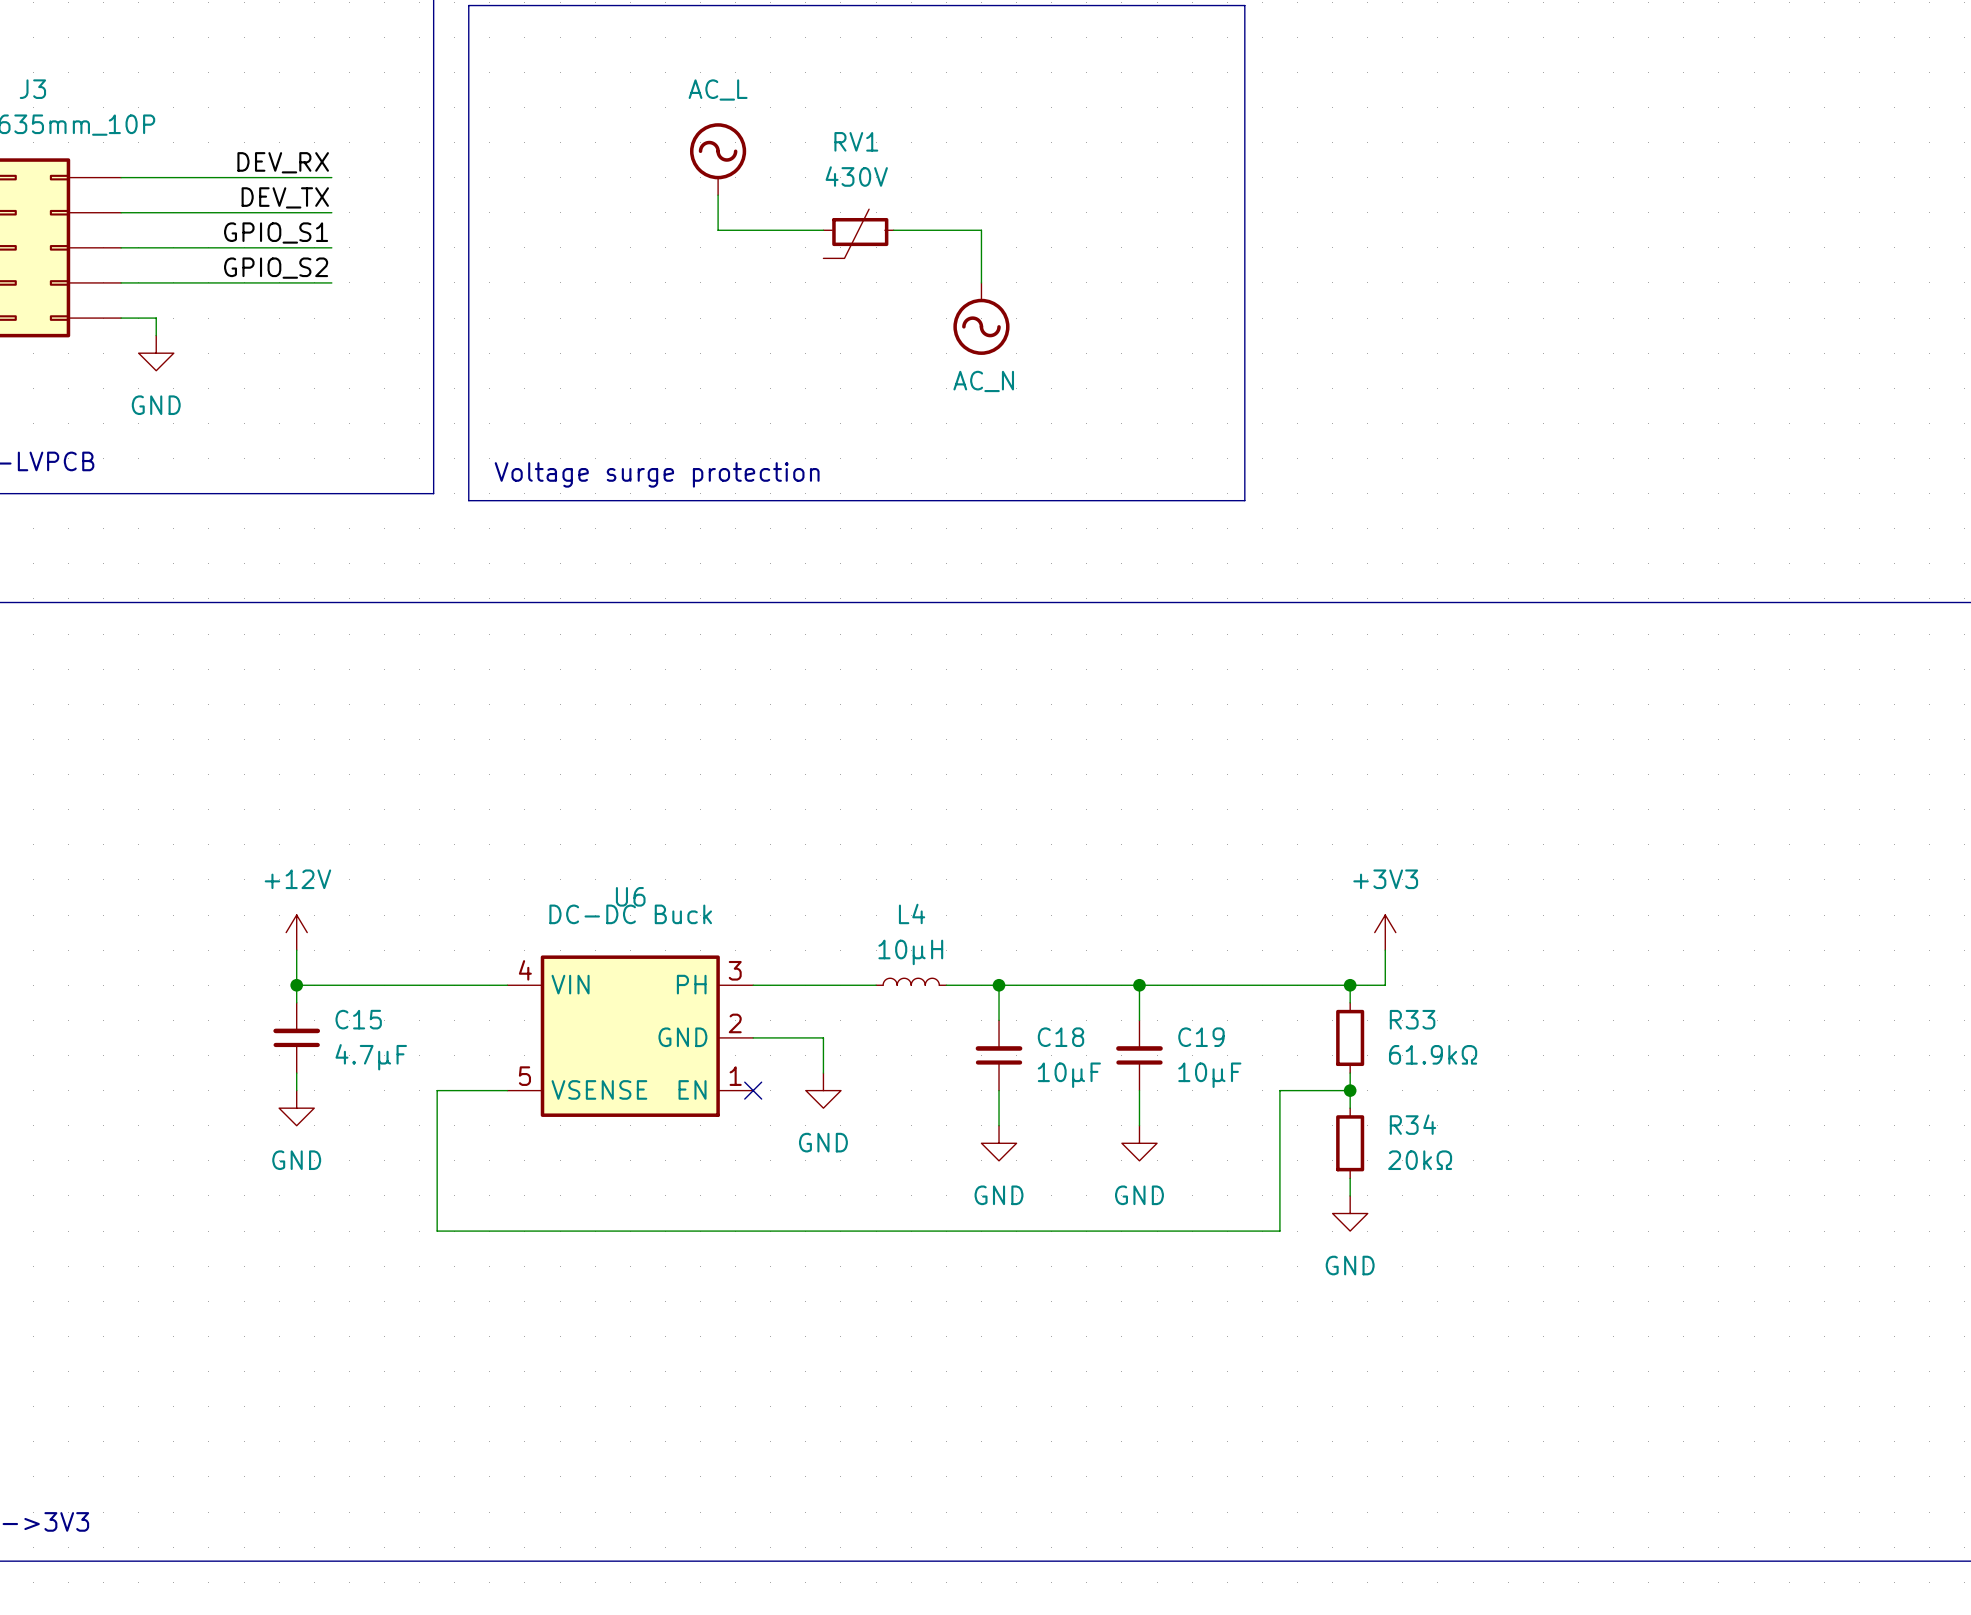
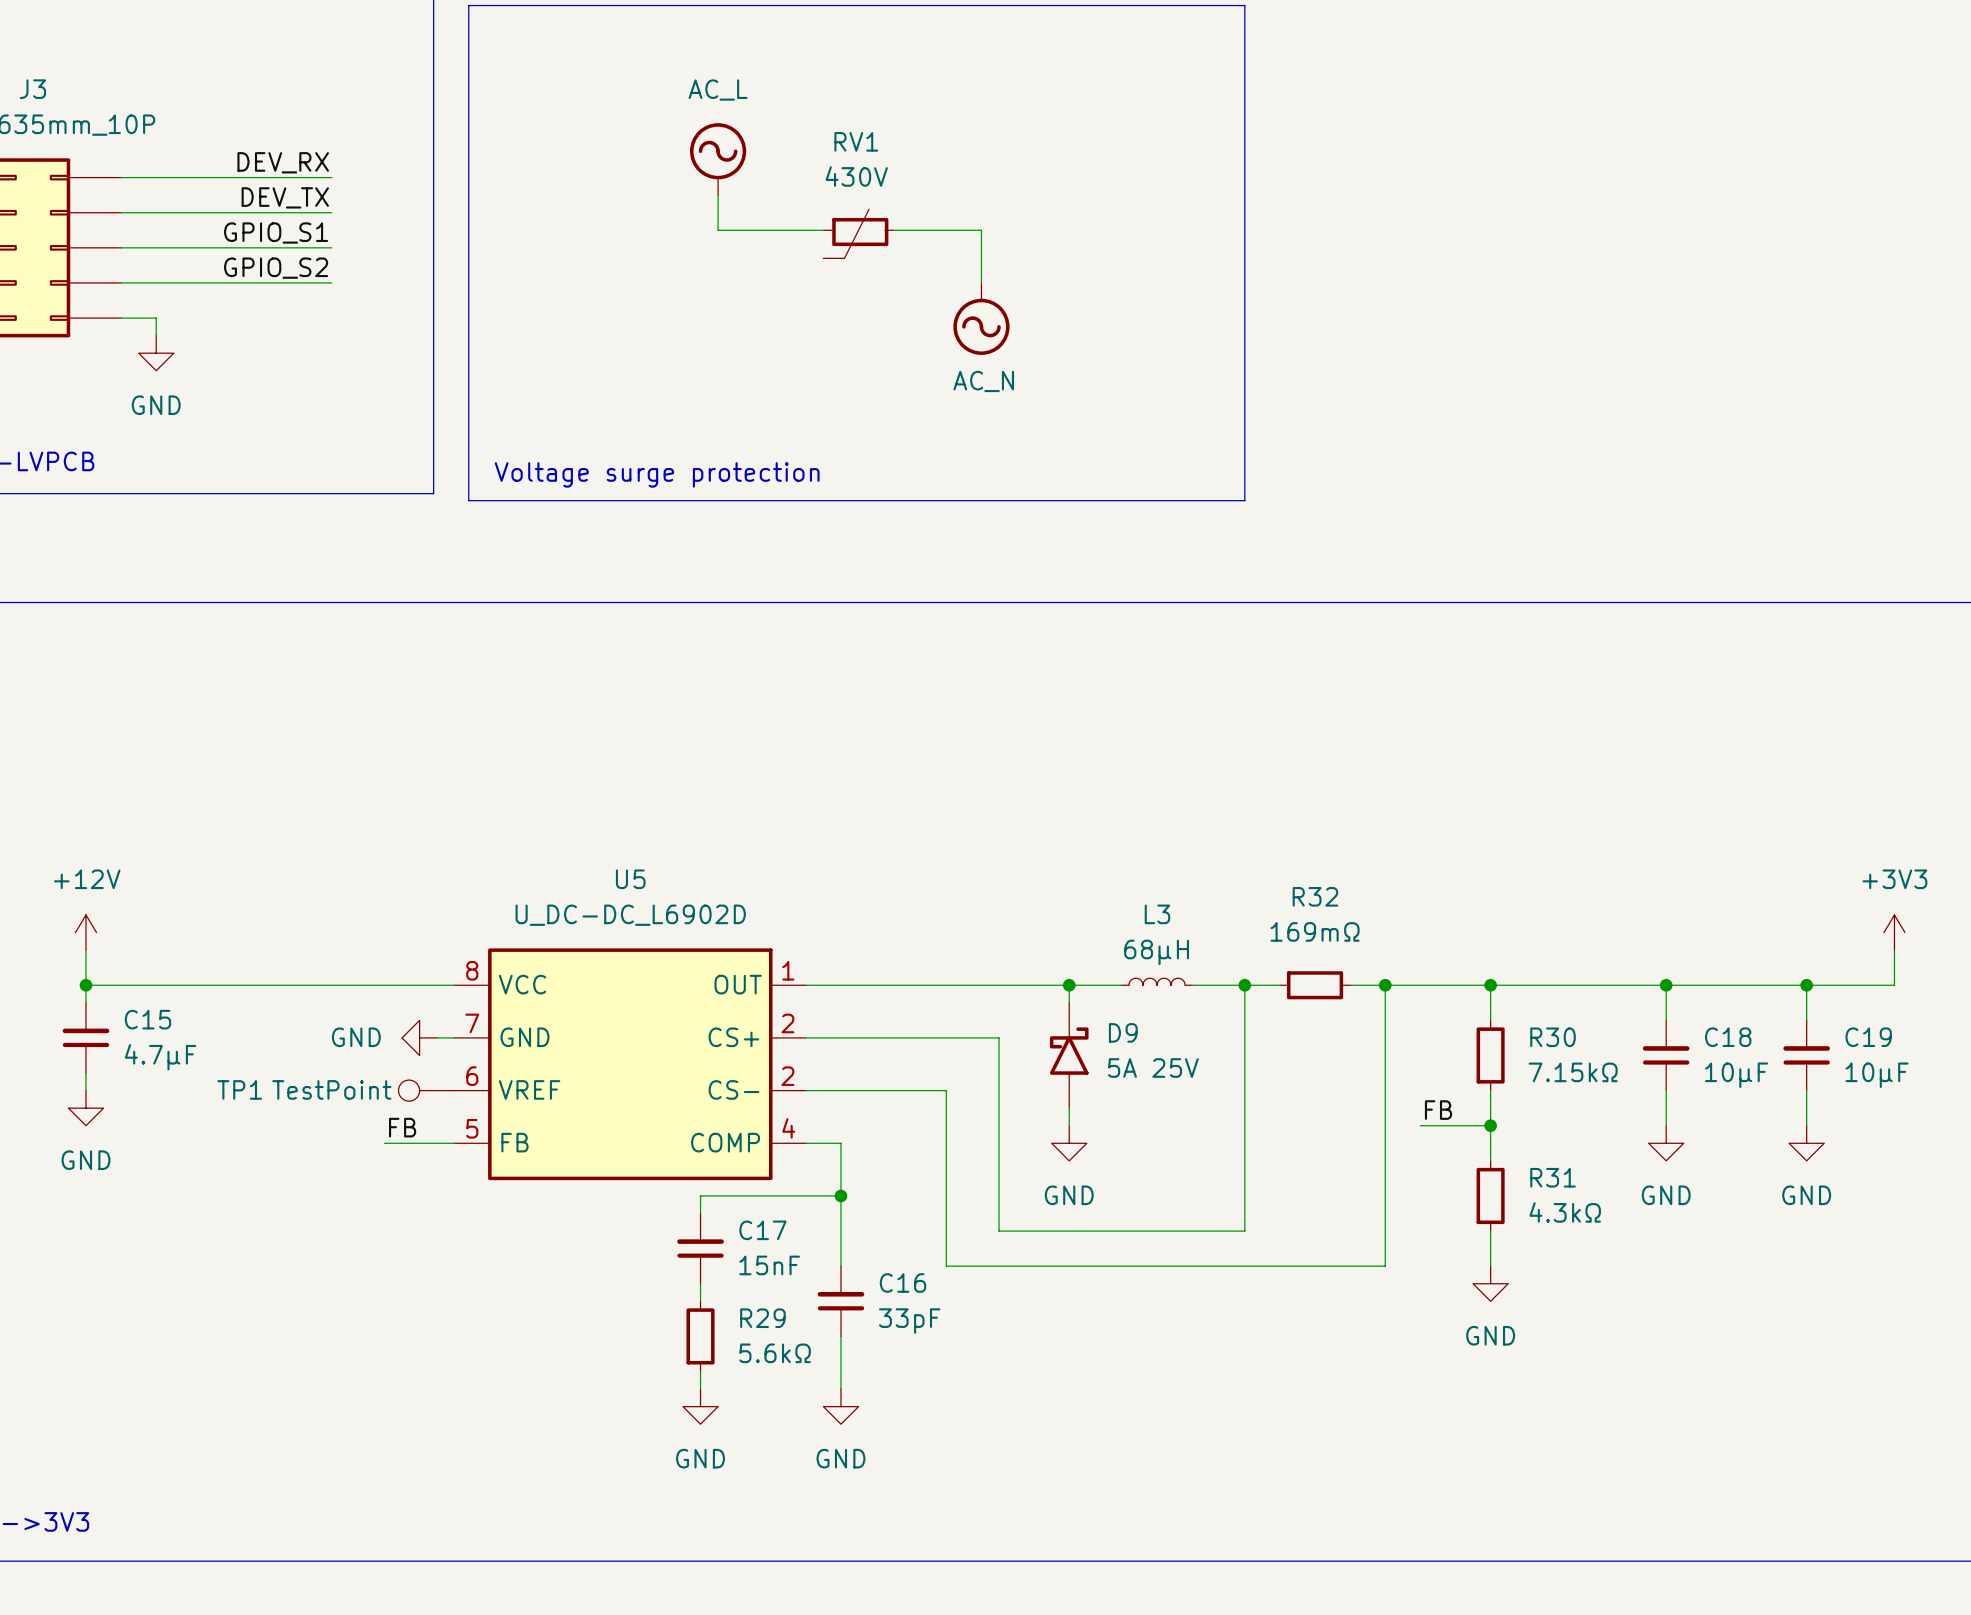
power symbol position: +12V (296, 932) -> +12V (86, 932)
power symbol: +3V3 (1385, 932) -> none
power symbol: none -> +3V3 (1894, 932)
wire: (296, 950) (296, 1002) -> (86, 950) (86, 1002)
wire: (1385, 950) (1385, 985) -> (1490, 985) (1490, 1020)
wire: none -> (1894, 950) (1894, 985) (1385, 985) (1385, 1266) (946, 1266) (946, 1090) (805, 1090)
L4: (911, 981) -> none
L3: none -> (1157, 981)
wire: none -> (86, 985) (296, 985)
junction: none -> (86, 985)
junction: (296, 985) -> none
wire: (999, 985) (999, 1020) -> none
junction: (999, 985) -> none
wire: none -> (1069, 985) (1069, 1002)
junction: none -> (1069, 985)
wire: (1121, 985) (1192, 985) -> (876, 985) (946, 985)
wire: (1139, 985) (1139, 1020) -> none
junction: (1139, 985) -> none
junction: none -> (1244, 985)
wire: (1279, 985) (1350, 985) (1350, 1002) -> none
R32: none -> (1315, 985)
junction position: (1350, 985) -> (1385, 985)
junction: none -> (1490, 985)
wire: none -> (1666, 985) (1666, 1020)
junction: none -> (1666, 985)
wire: none -> (1806, 985) (1806, 1020)
junction: none -> (1806, 985)
U6: (630, 1036) -> none
C15 position: (296, 1037) -> (86, 1037)
power symbol: none -> GND (419, 1037)
wire: none -> (437, 1037) (454, 1037)
wire: (823, 1037) (823, 1073) -> (823, 1037) (999, 1037) (999, 1090)
R33: (1350, 1037) -> none
C18 position: (999, 1055) -> (1666, 1055)
D9: none -> (1069, 1055)
C19 position: (1139, 1055) -> (1806, 1055)
R30: none -> (1490, 1055)
U5: none -> (630, 1064)
wire: (296, 1073) (296, 1090) -> (86, 1073) (86, 1090)
wire: (1350, 1073) (1350, 1108) -> (1490, 1231) (1490, 1266)
TP1: none -> TestPoint (426, 1090)
wire: (507, 1090) (437, 1090) (437, 1231) (999, 1231) -> (999, 1125) (999, 1231)
no-connect mark: (753, 1090) -> none
power symbol: GND (823, 1090) -> none
wire: (1139, 1090) (1139, 1125) -> none
wire: (1350, 1090) (1279, 1090) (1279, 1231) (1244, 1231) -> (1244, 985) (1244, 1231)
junction: (1350, 1090) -> none
wire: none -> (1490, 1090) (1490, 1160)
wire: none -> (1666, 1090) (1666, 1125)
wire: none -> (1806, 1090) (1806, 1125)
power symbol: none -> GND (86, 1108)
power symbol: GND (296, 1108) -> none
label: none -> FB (1438, 1110)
wire: none -> (1420, 1125) (1490, 1125)
junction: none -> (1490, 1125)
label: none -> FB (402, 1127)
wire: none -> (384, 1143) (454, 1143)
wire: none -> (805, 1143) (840, 1143) (840, 1266)
power symbol: GND (999, 1143) -> none
power symbol: none -> GND (1069, 1143)
power symbol: GND (1139, 1143) -> none
R34: (1350, 1143) -> none
power symbol: none -> GND (1666, 1143)
power symbol: none -> GND (1806, 1143)
wire: (1350, 1178) (1350, 1195) -> (1069, 1108) (1069, 1125)
wire: none -> (840, 1195) (700, 1195) (700, 1213)
junction: none -> (840, 1195)
R31: none -> (1490, 1195)
power symbol: GND (1350, 1213) -> none
C17: none -> (700, 1248)
wire: none -> (700, 1283) (700, 1301)
power symbol: none -> GND (1490, 1283)
C16: none -> (840, 1301)
R29: none -> (700, 1336)
wire: none -> (840, 1336) (840, 1389)
wire: none -> (700, 1371) (700, 1389)
power symbol: none -> GND (700, 1406)
power symbol: none -> GND (840, 1406)

